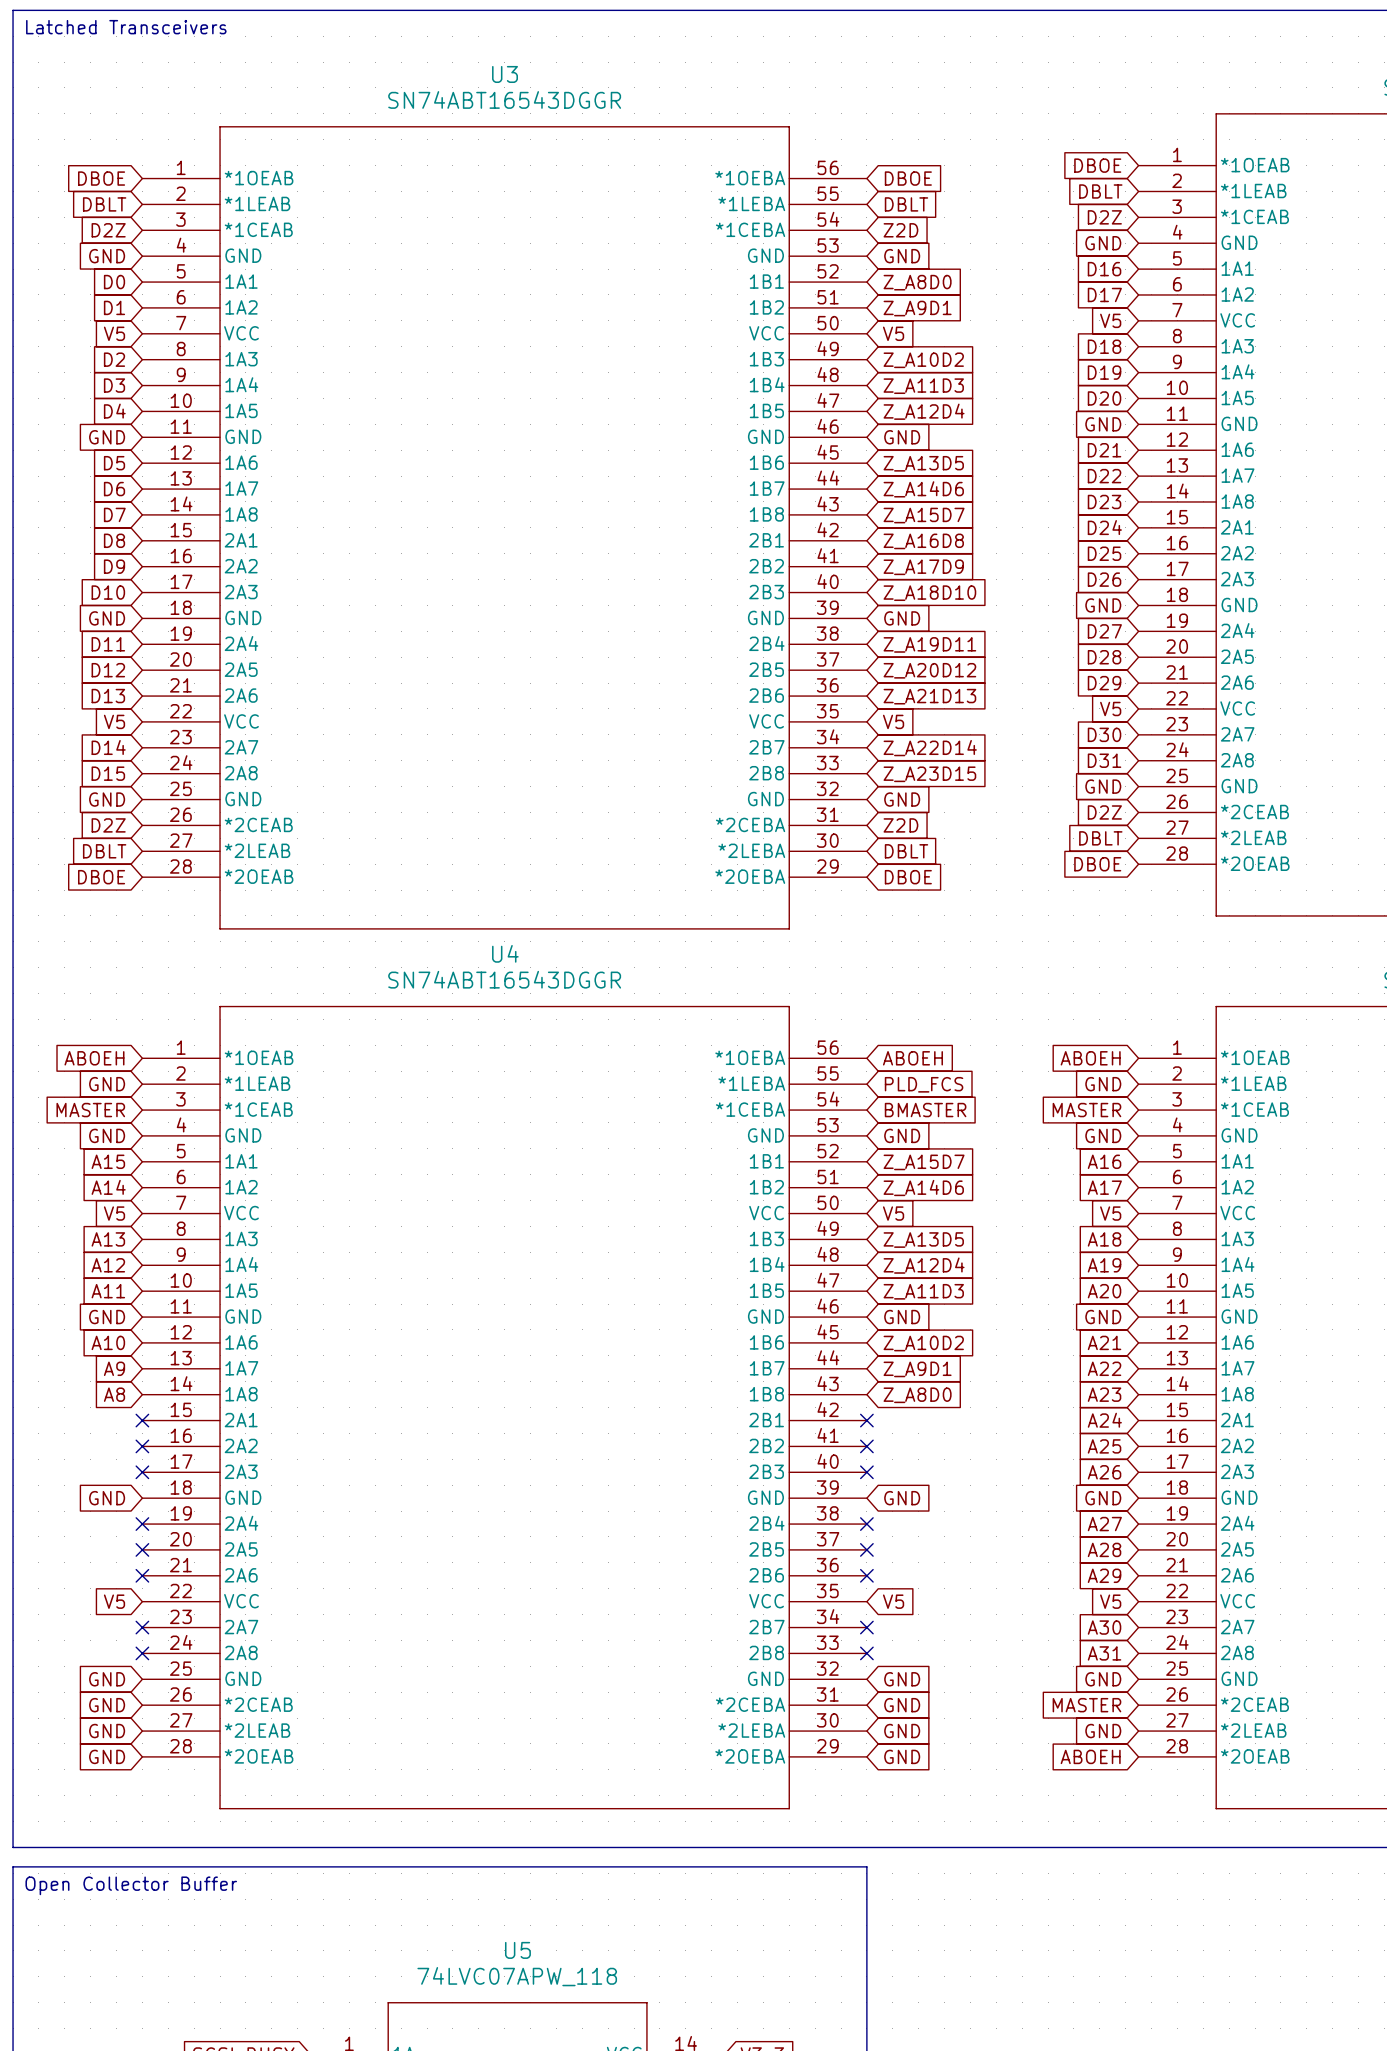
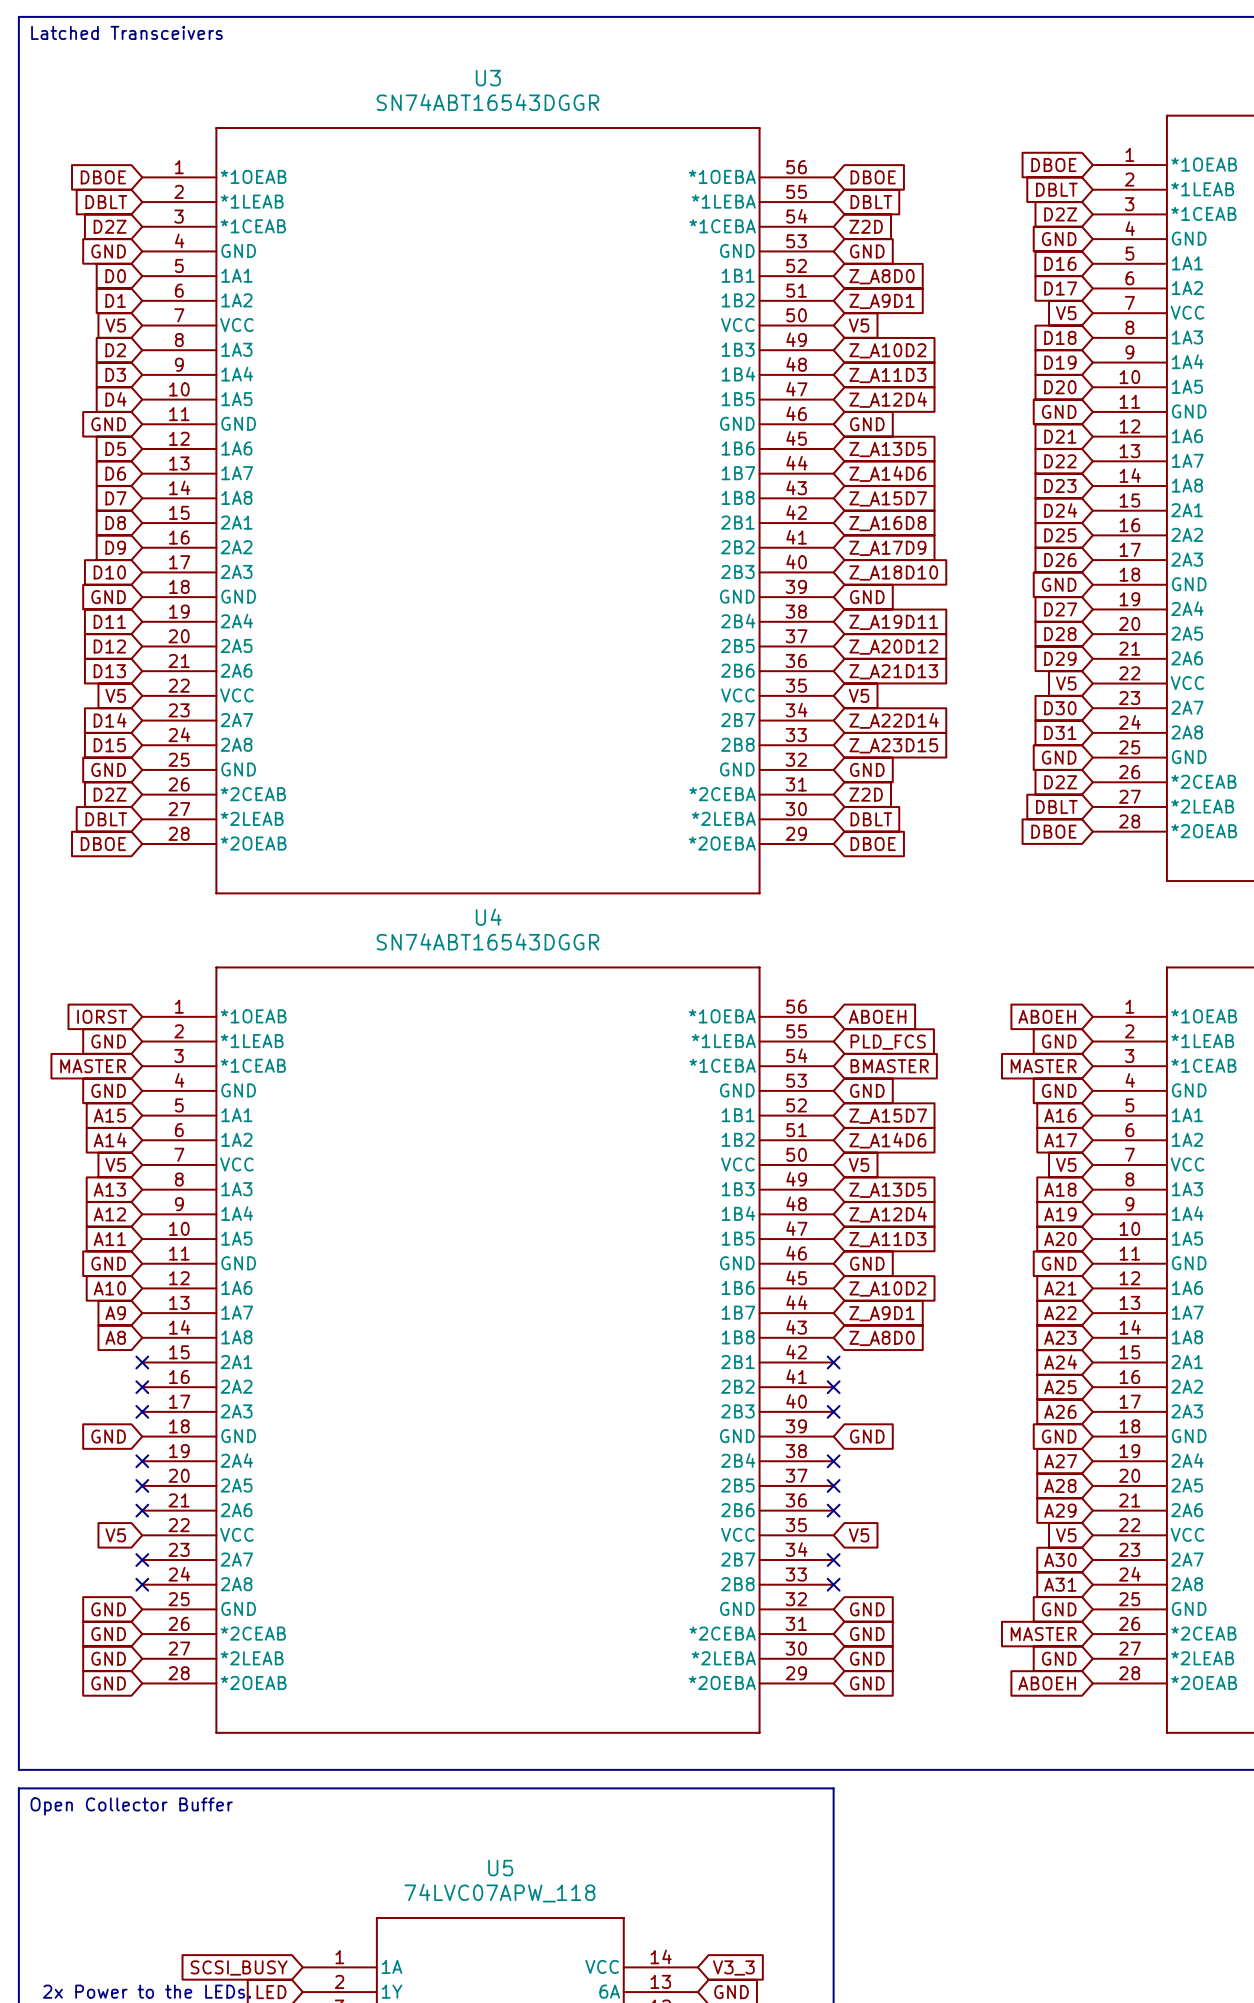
global label: ABOEH (94, 1058) -> IORST (102, 1016)

